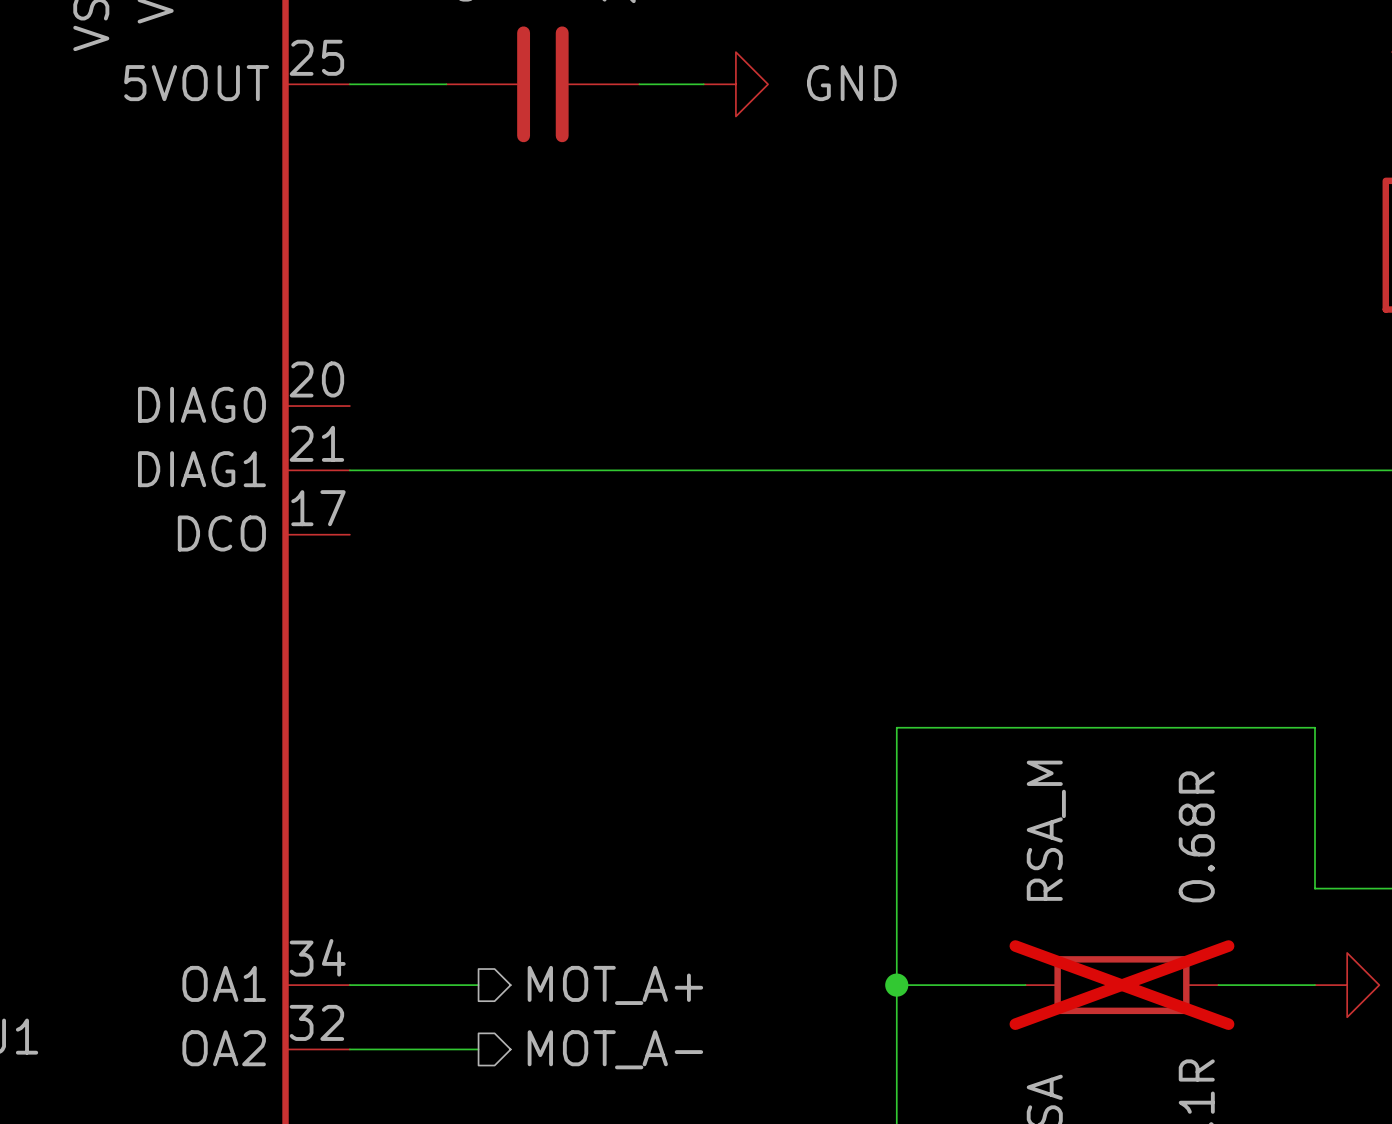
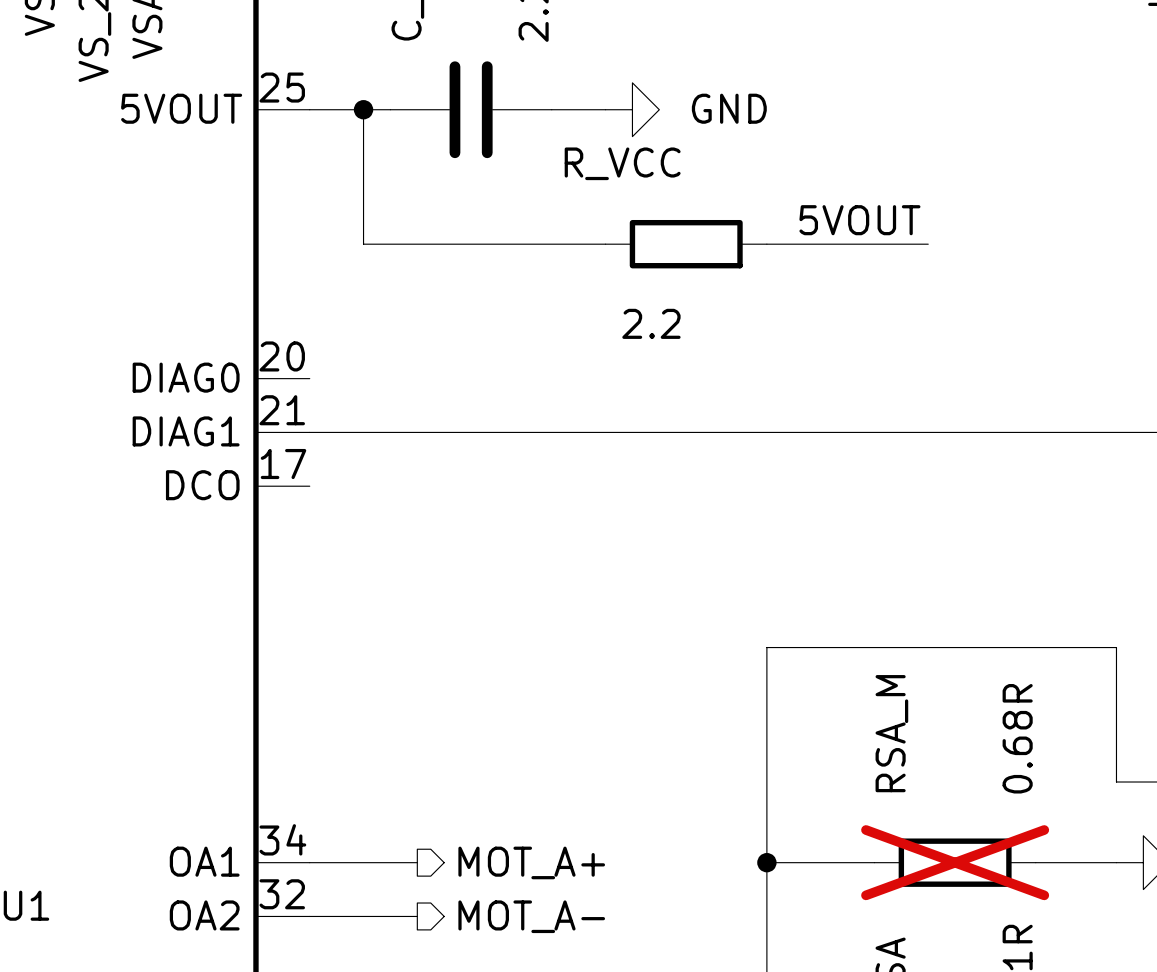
wire: none -> (363, 109) (363, 244) (605, 244)
junction: none -> (363, 109)
label: none -> 5VOUT (859, 220)
R_VCC: none -> 2.2 (686, 244)
wire: none -> (766, 244) (928, 244)

